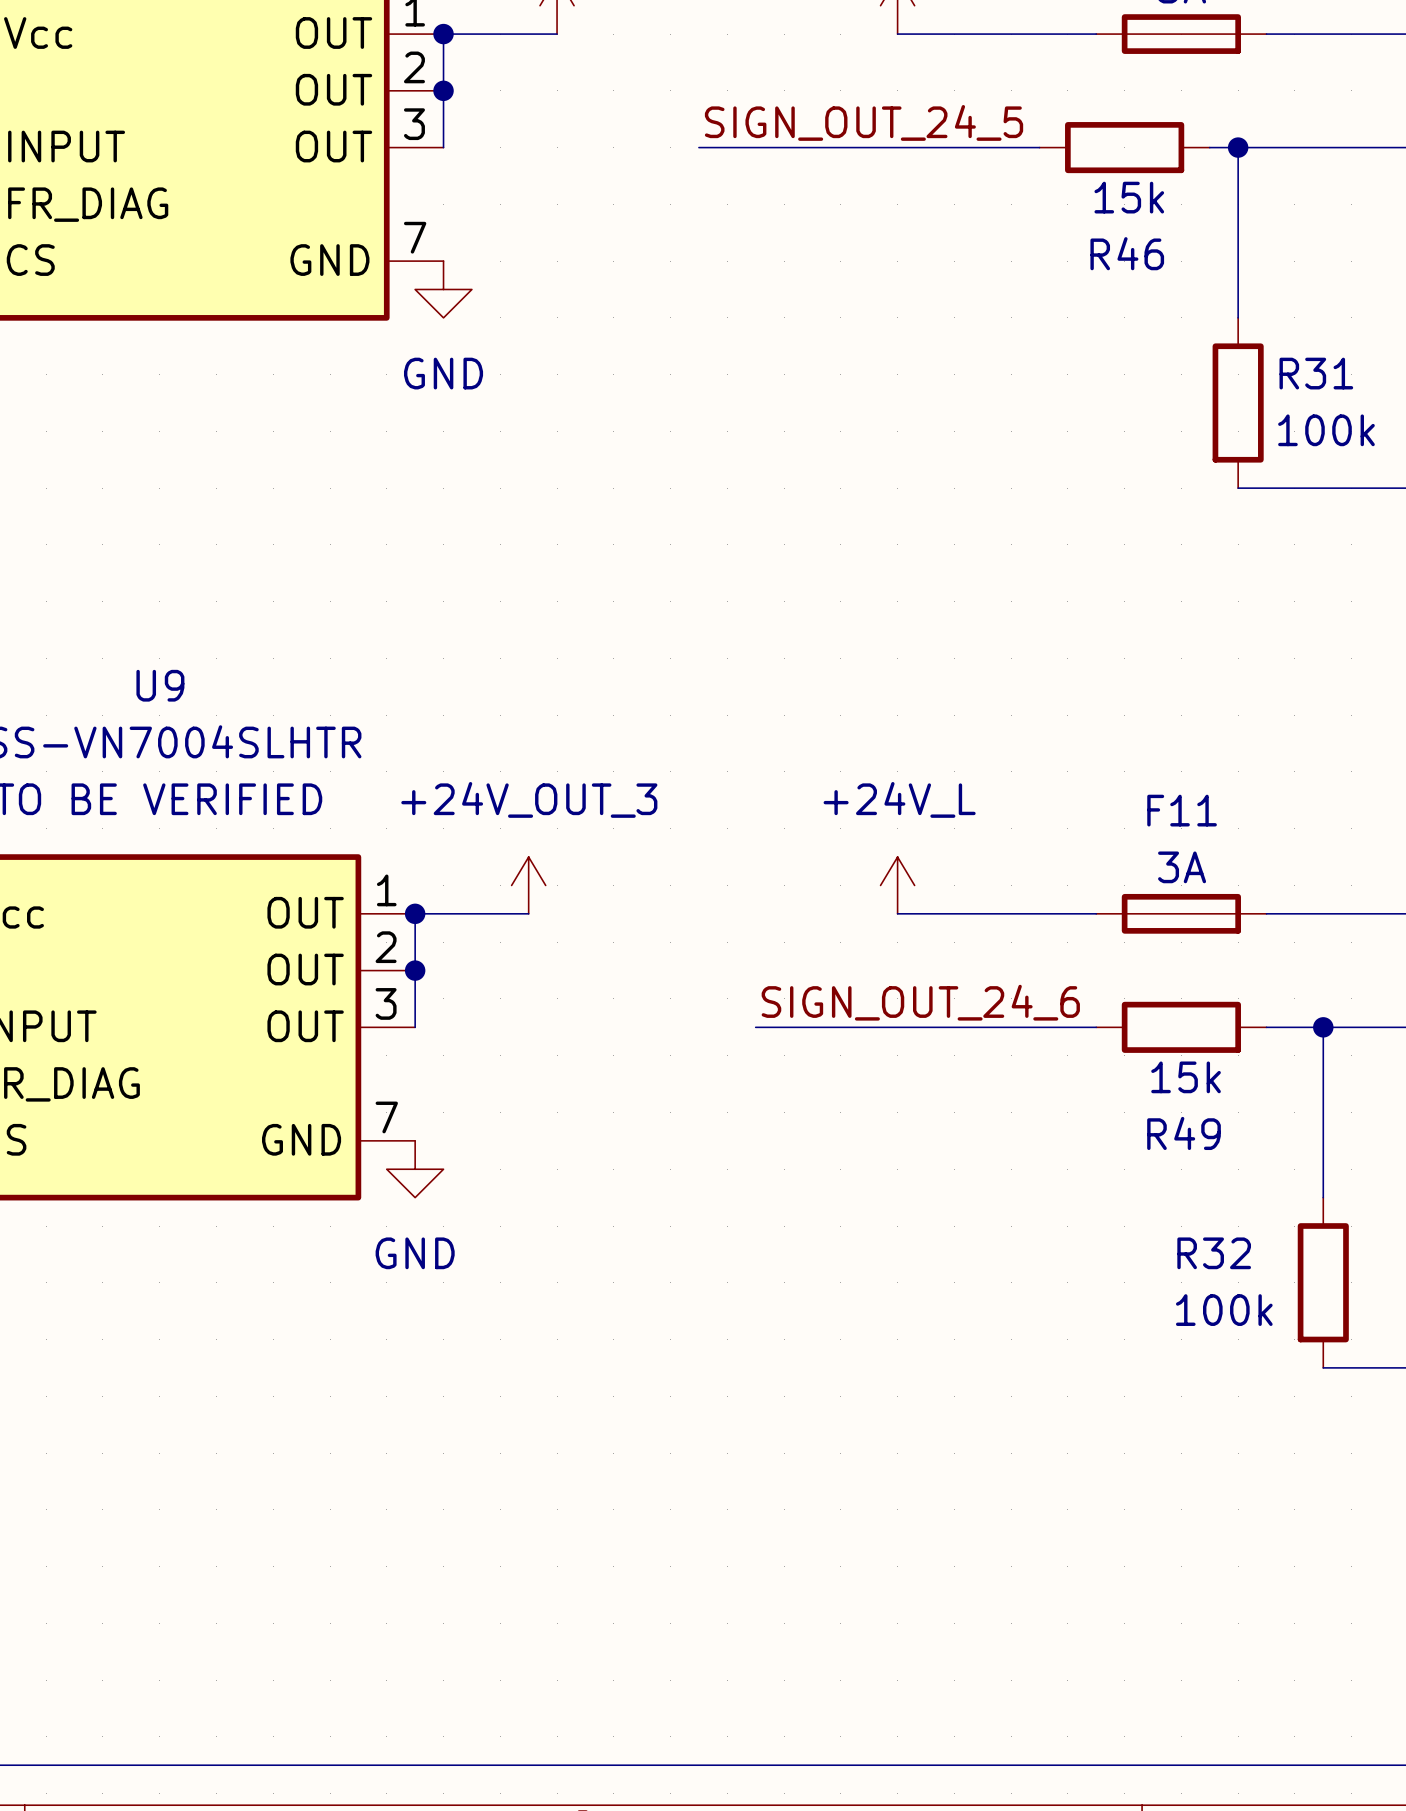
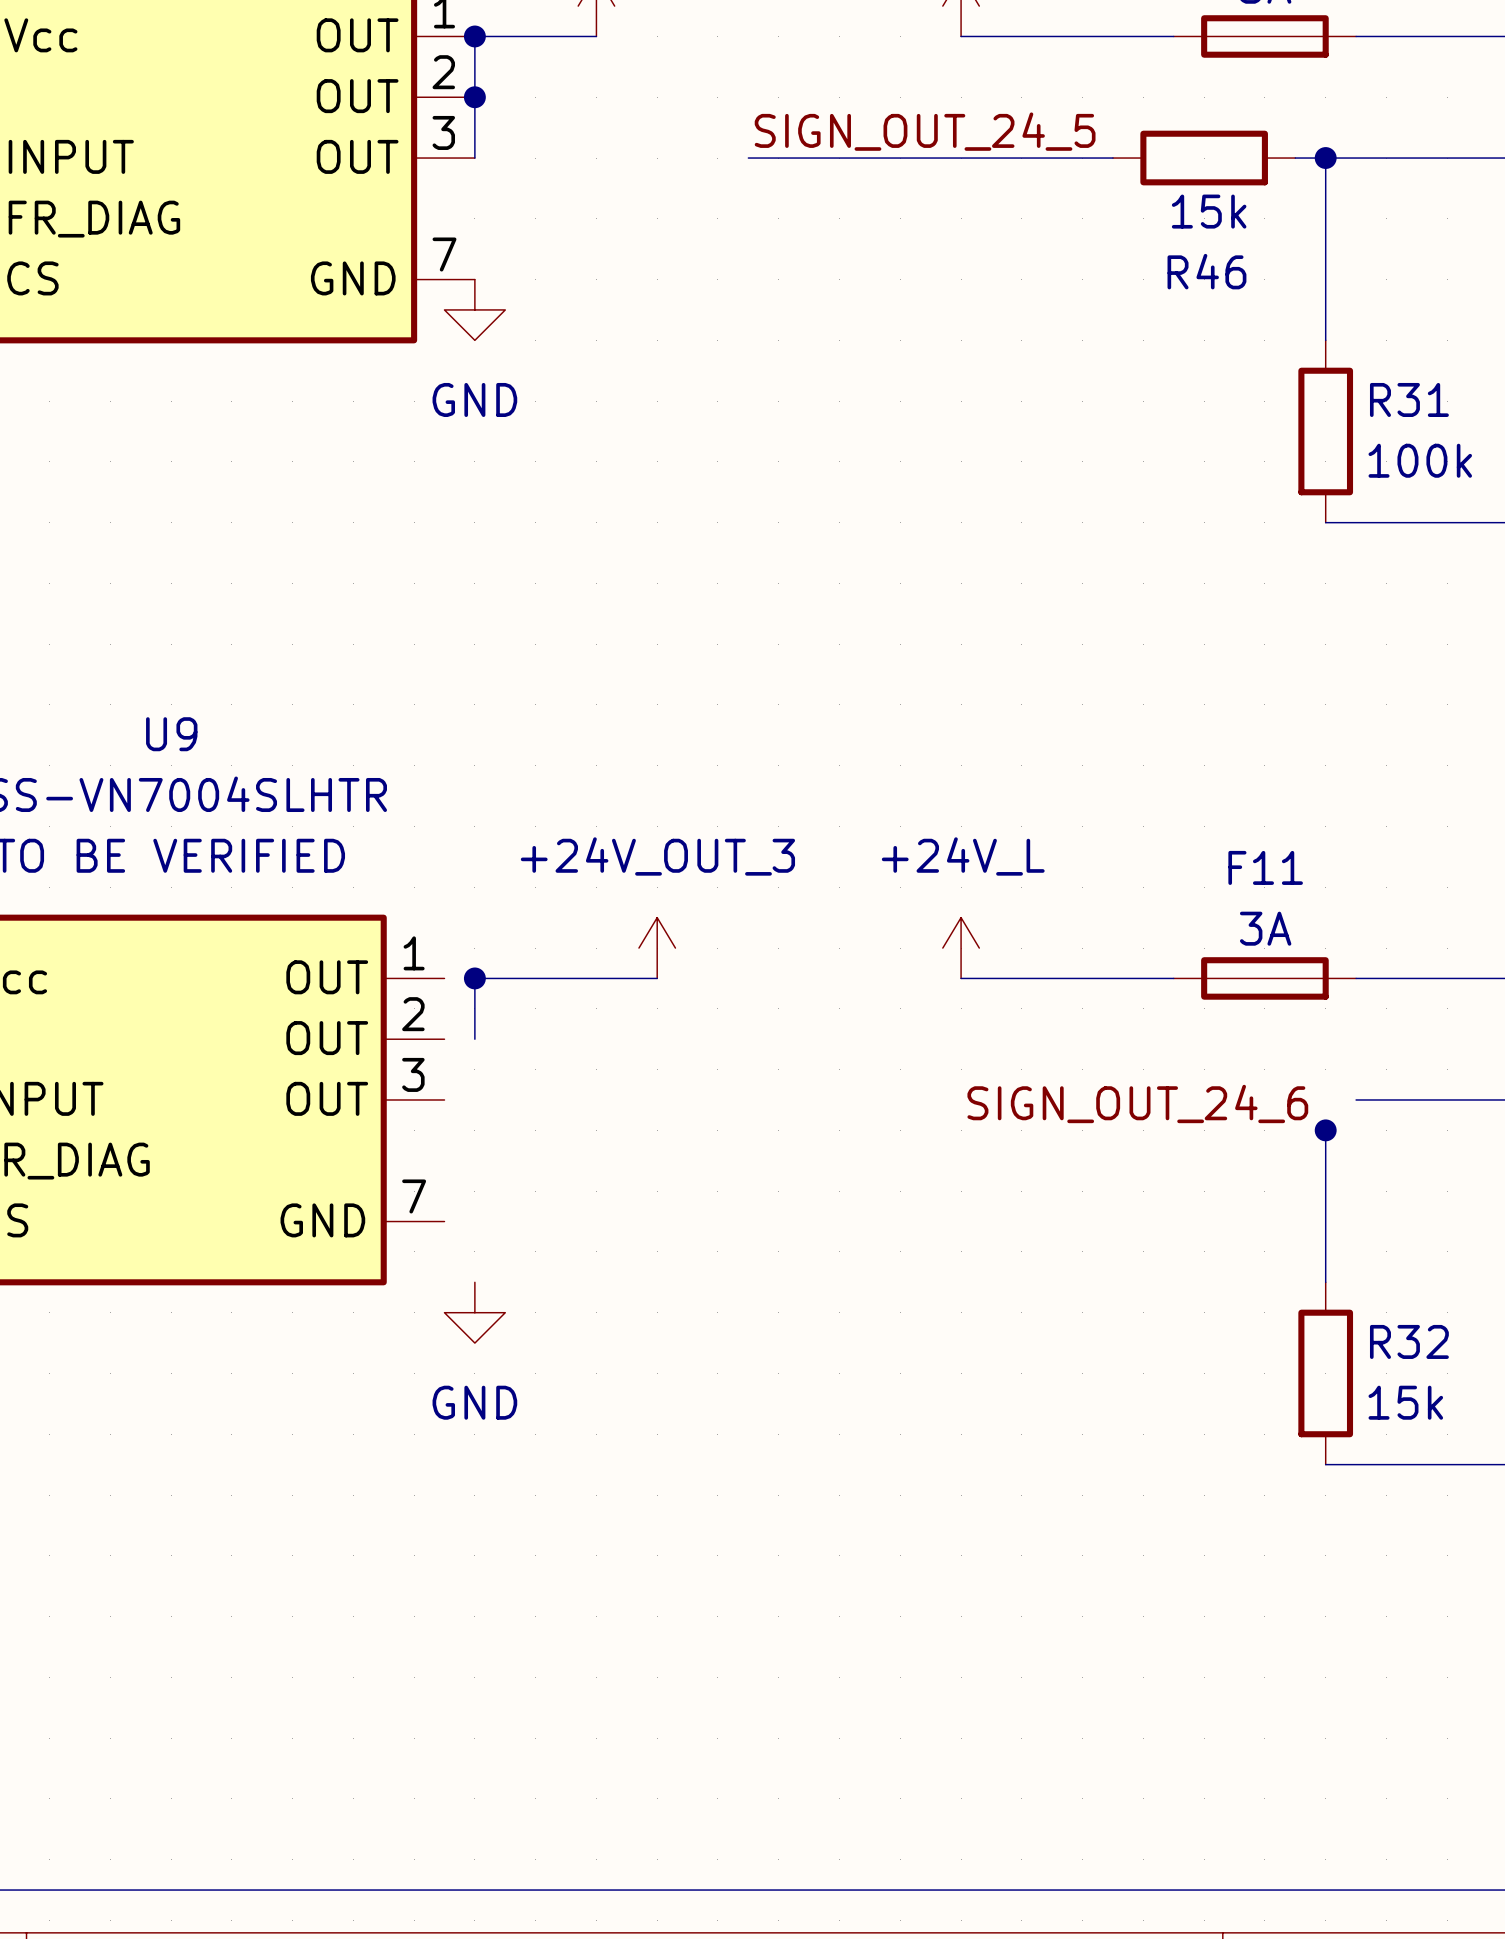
power symbol position: +24V_OUT_3 (528, 885) -> +24V_OUT_3 (657, 948)
junction position: (415, 913) -> (474, 978)
wire: (443, 913) (415, 913) (415, 1027) -> (474, 978) (474, 1039)
wire: none -> (566, 978) (657, 978)
junction: (415, 970) -> none
label position: SIGN_OUT_24_6 (920, 1002) -> SIGN_OUT_24_6 (1137, 1103)
wire: (755, 1027) (1096, 1027) -> none
R49: 15k (1181, 1027) -> none
wire: (1323, 1027) (1323, 1197) -> none
junction position: (1323, 1027) -> (1325, 1130)
wire: none -> (1325, 1130) (1325, 1282)
power symbol position: GND (415, 1169) -> GND (474, 1312)
R32 name position: R32 (1214, 1253) -> R32 (1409, 1341)
R32 position: (1323, 1282) -> (1325, 1373)
R32 value: 100k (1224, 1310) -> 15k (1405, 1402)
wire: none -> (1325, 1464) (1416, 1464)

